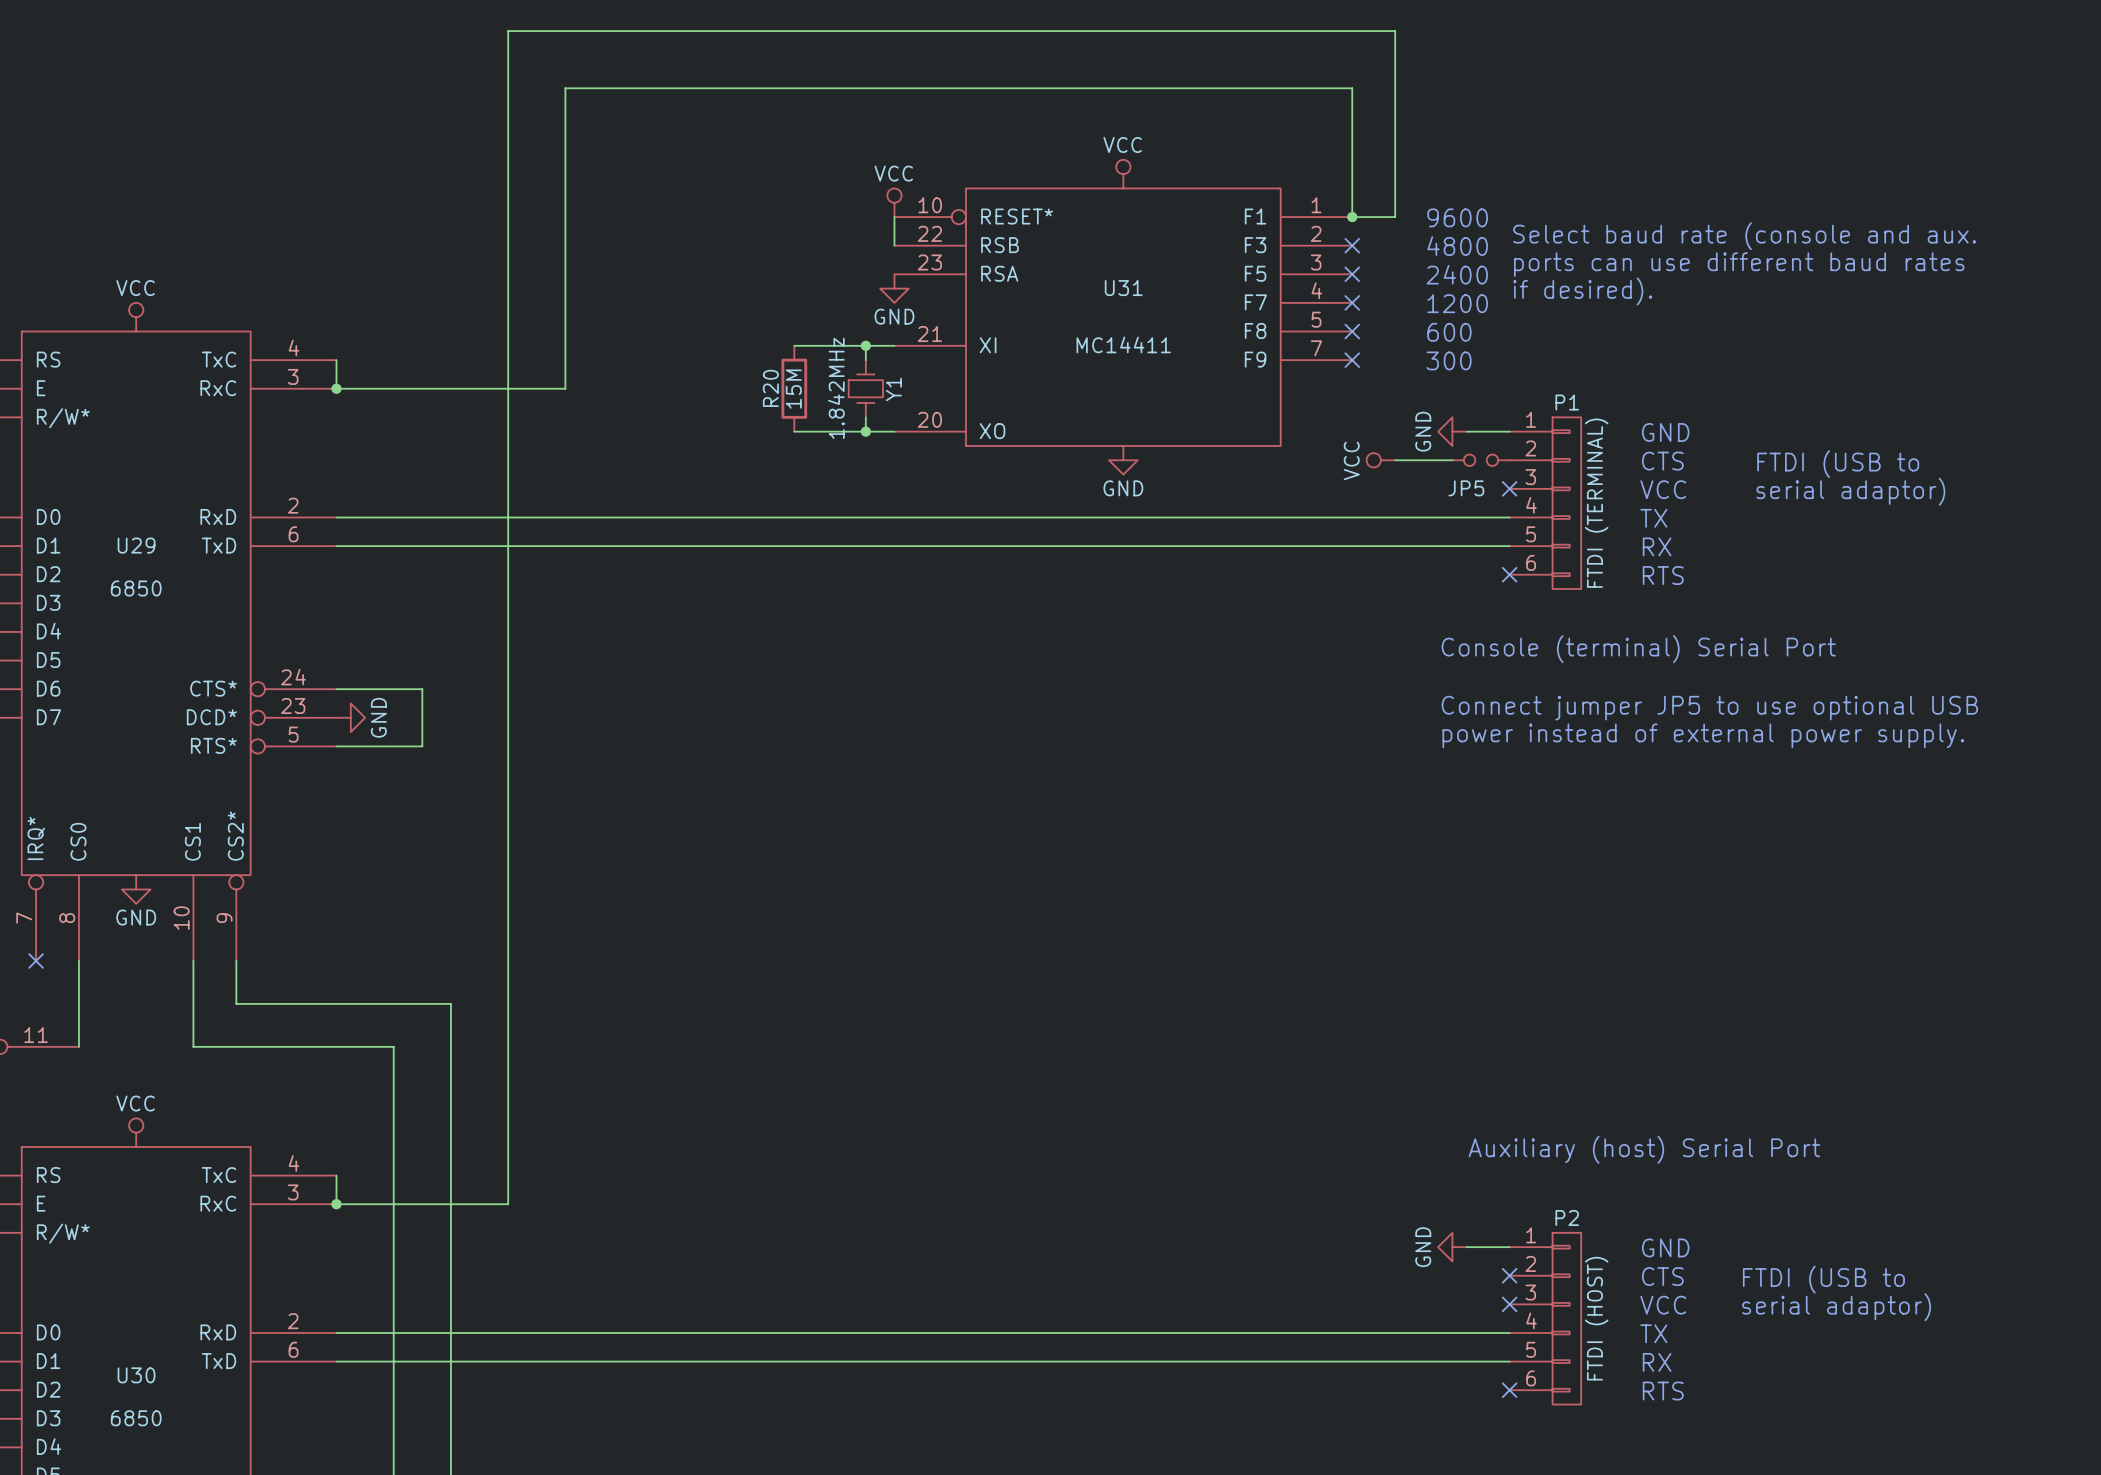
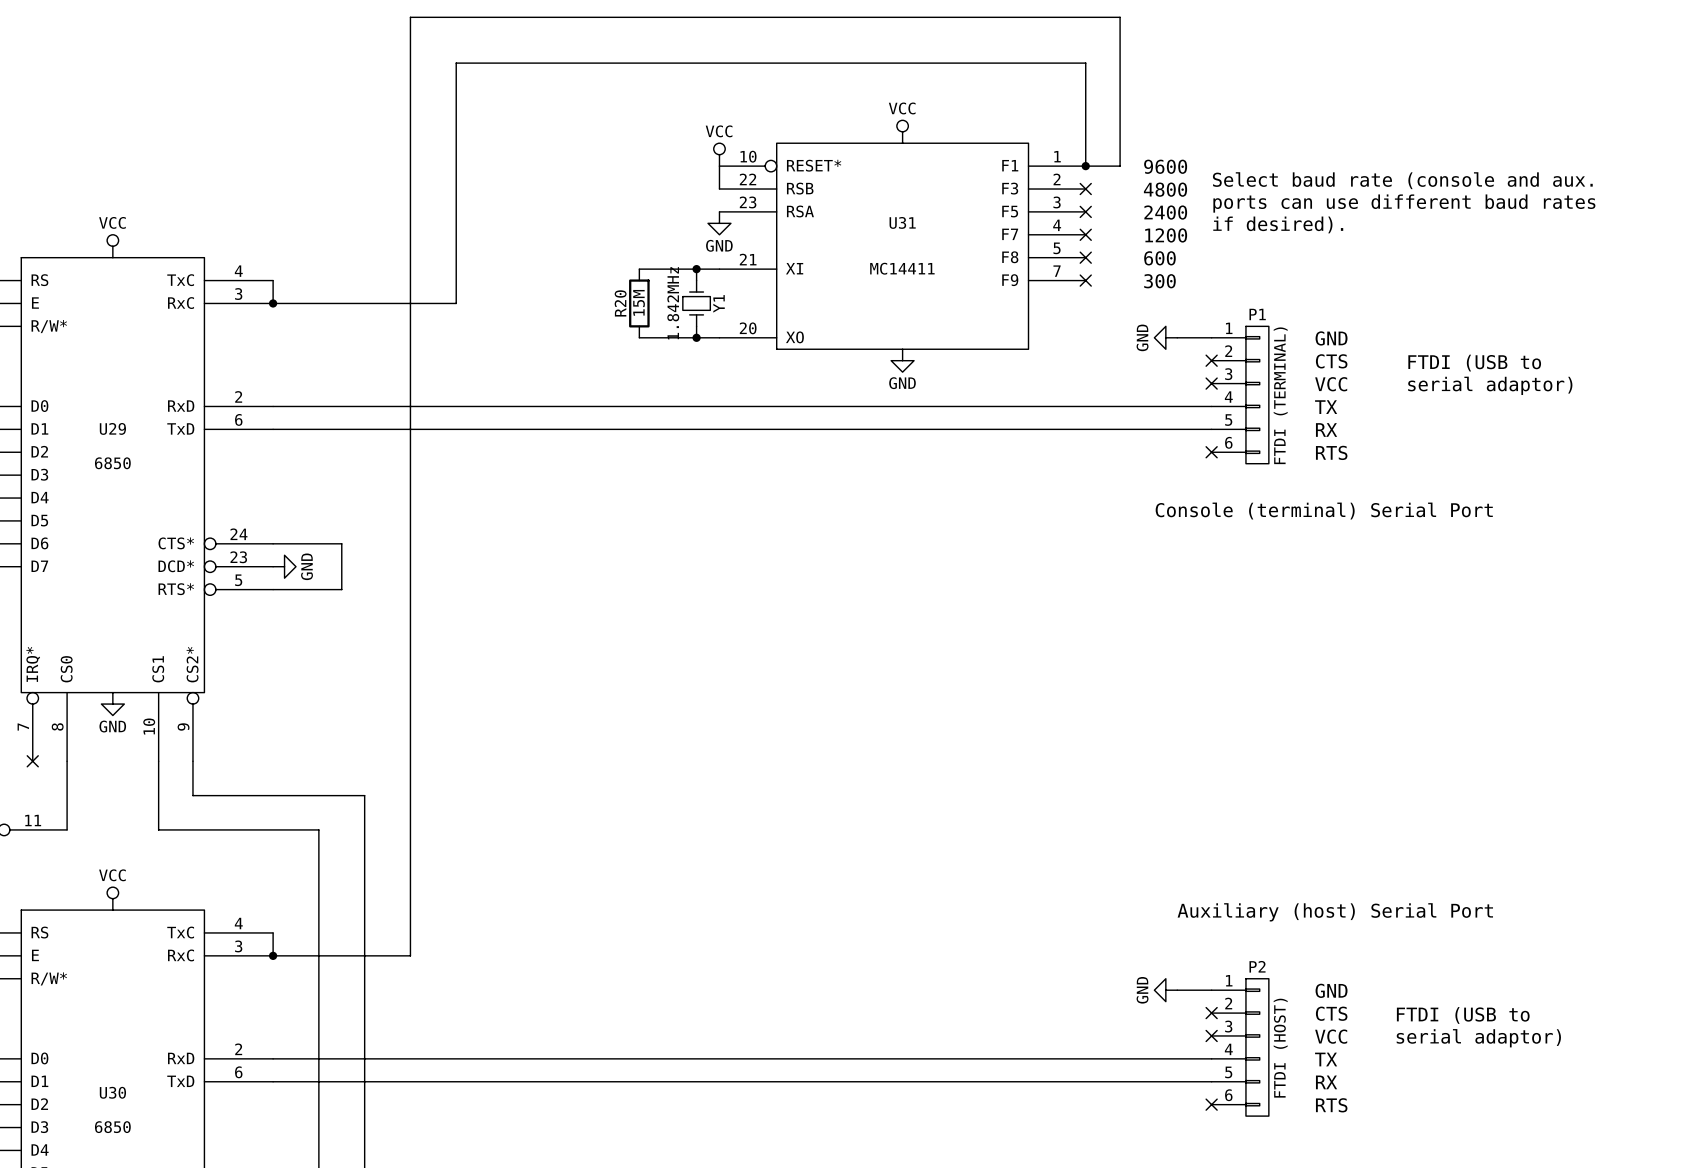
power symbol: VCC (1380, 460) -> none
wire: (1395, 460) (1452, 460) -> none
JP5: (1481, 460) -> none
no-connect mark: none -> (1211, 360)
text: Connect jumper JP5 to use optional USB (1709, 708) -> none
text: power instead of external power supply. (1703, 735) -> none

